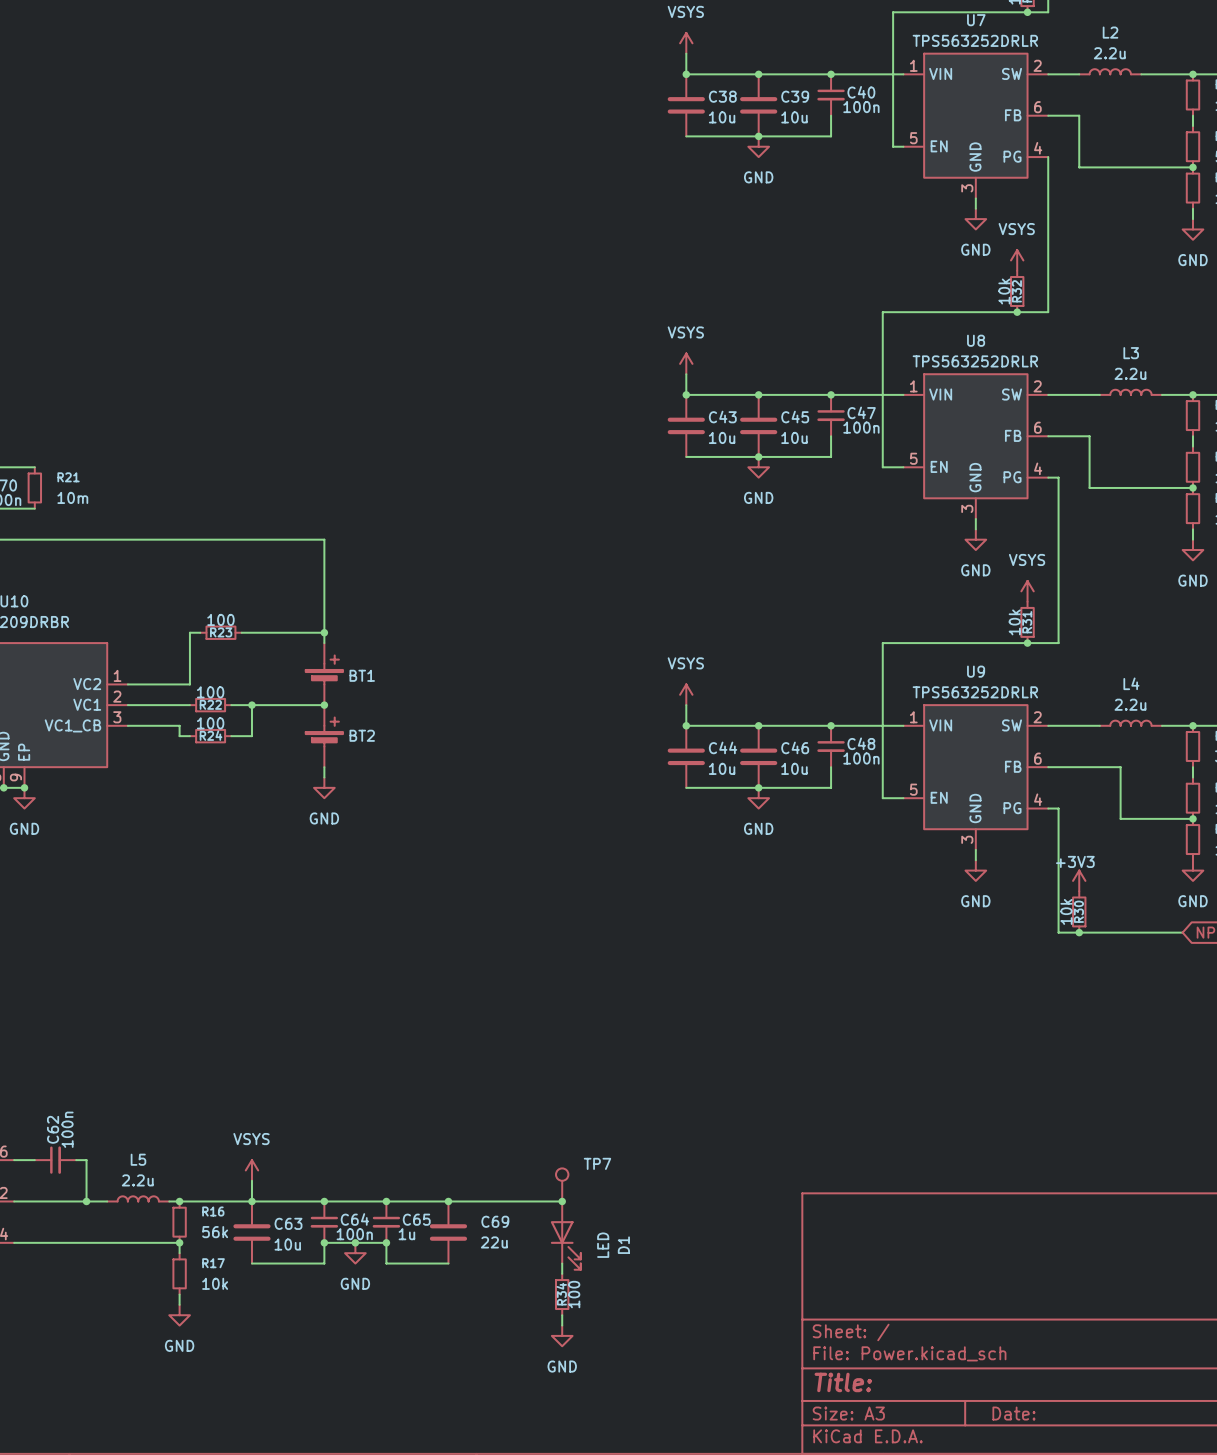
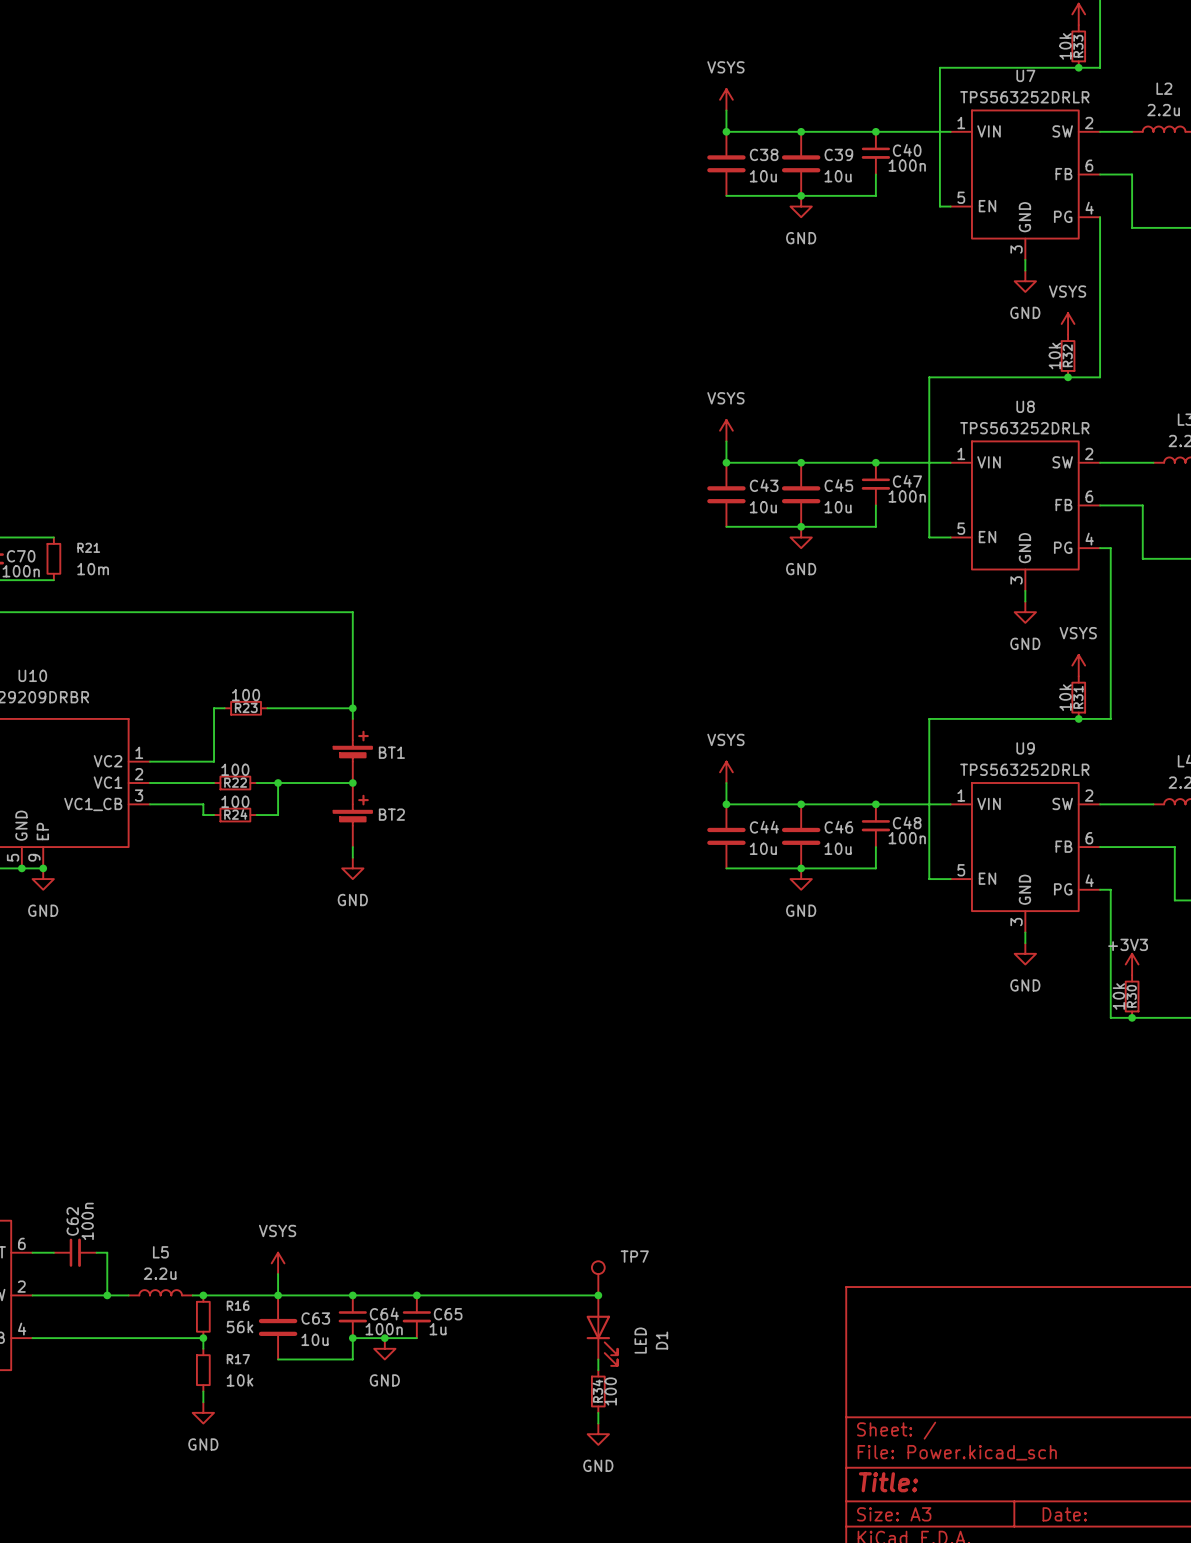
junction: (448, 1201) -> none
C69: 22u (448, 1232) -> none
wire: (386, 1242) (386, 1263) (448, 1263) -> none
junction: (386, 1242) -> none

